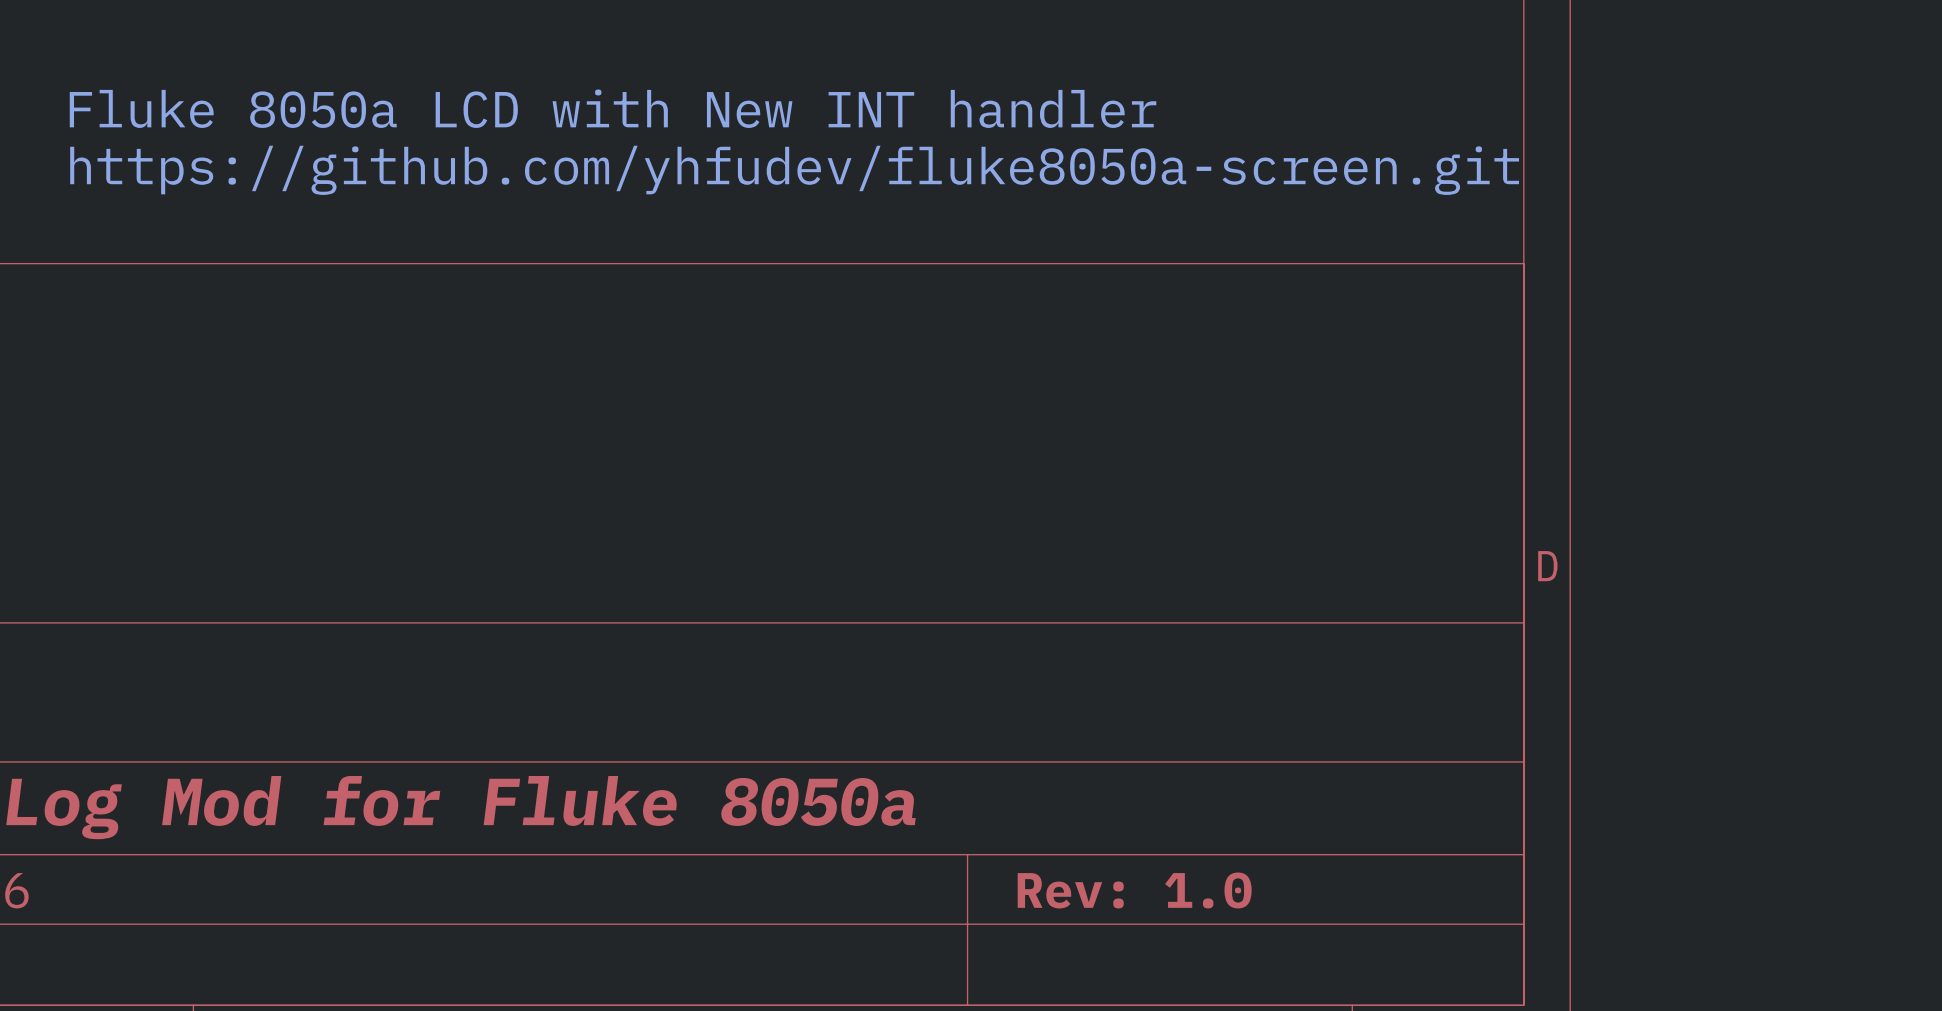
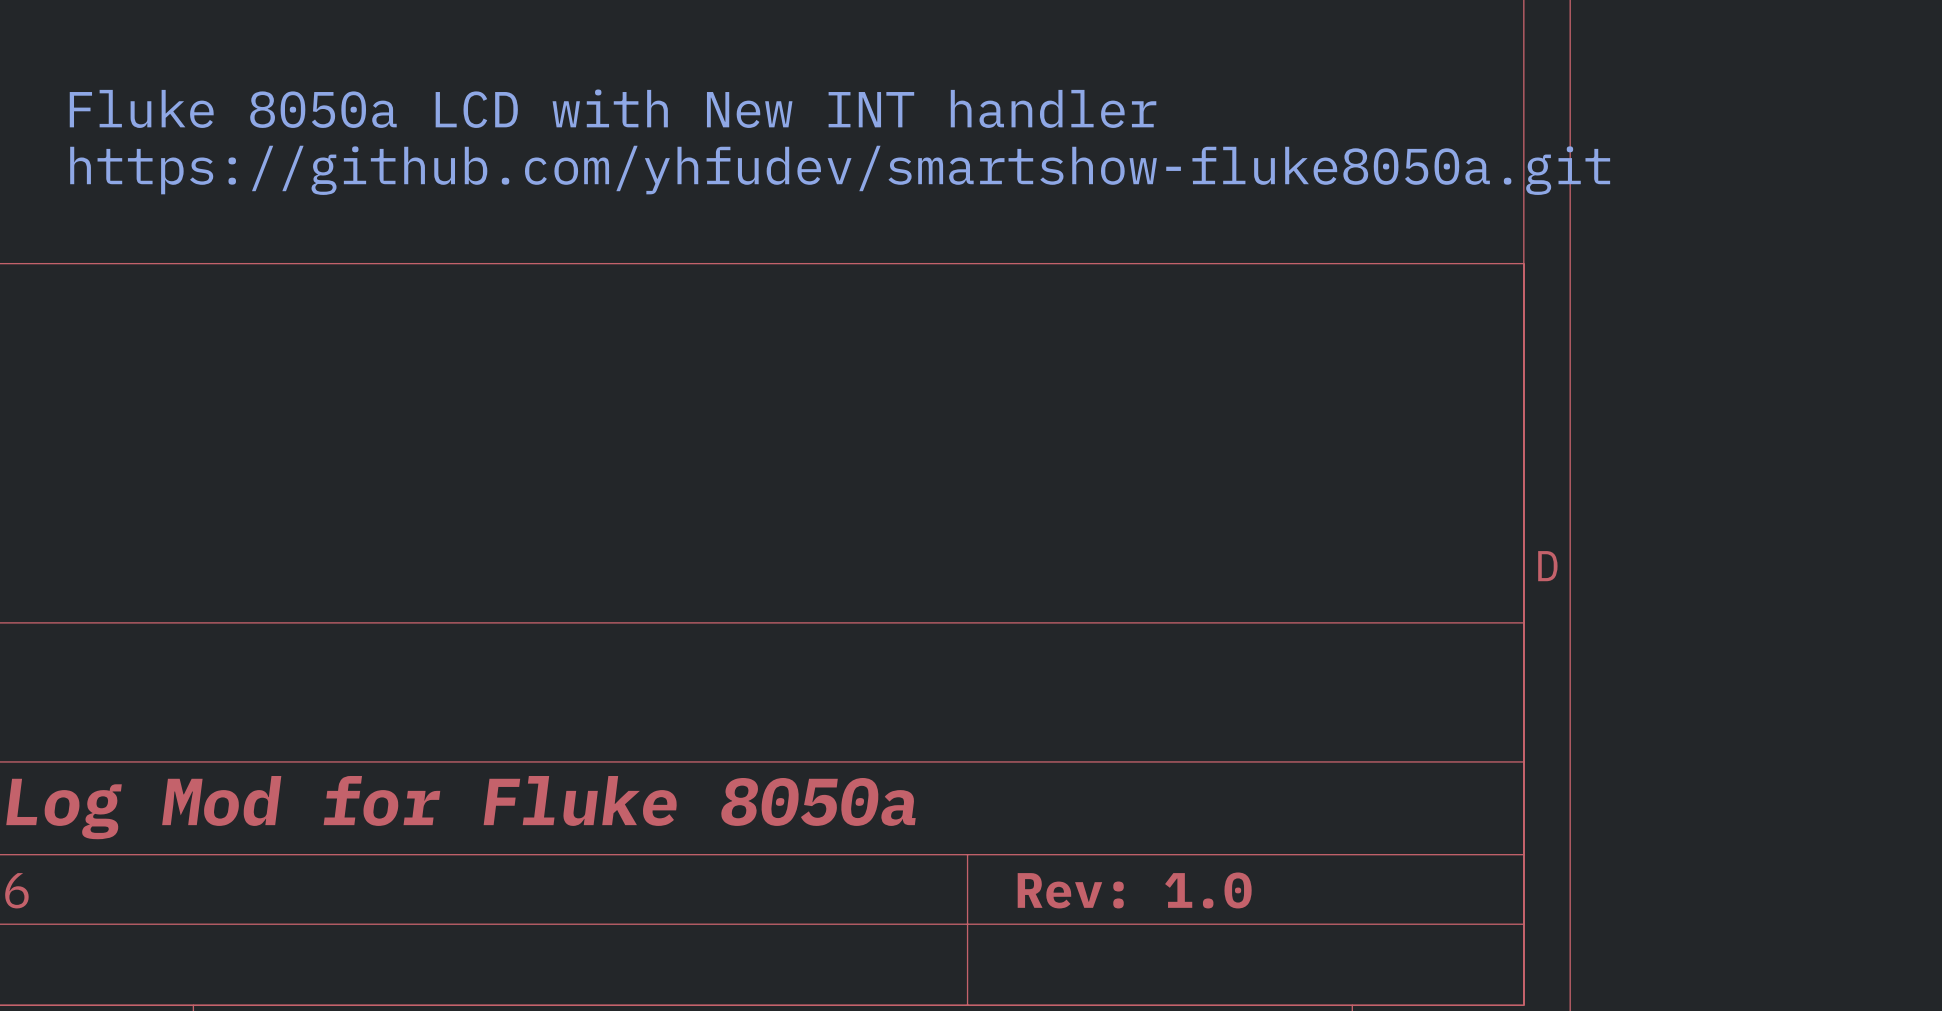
text: https://github.com/yhfudev/fluke8050a-screen.git (794, 170) -> https://github.com/yhfudev/smartshow-fluke8050a.git (840, 170)

